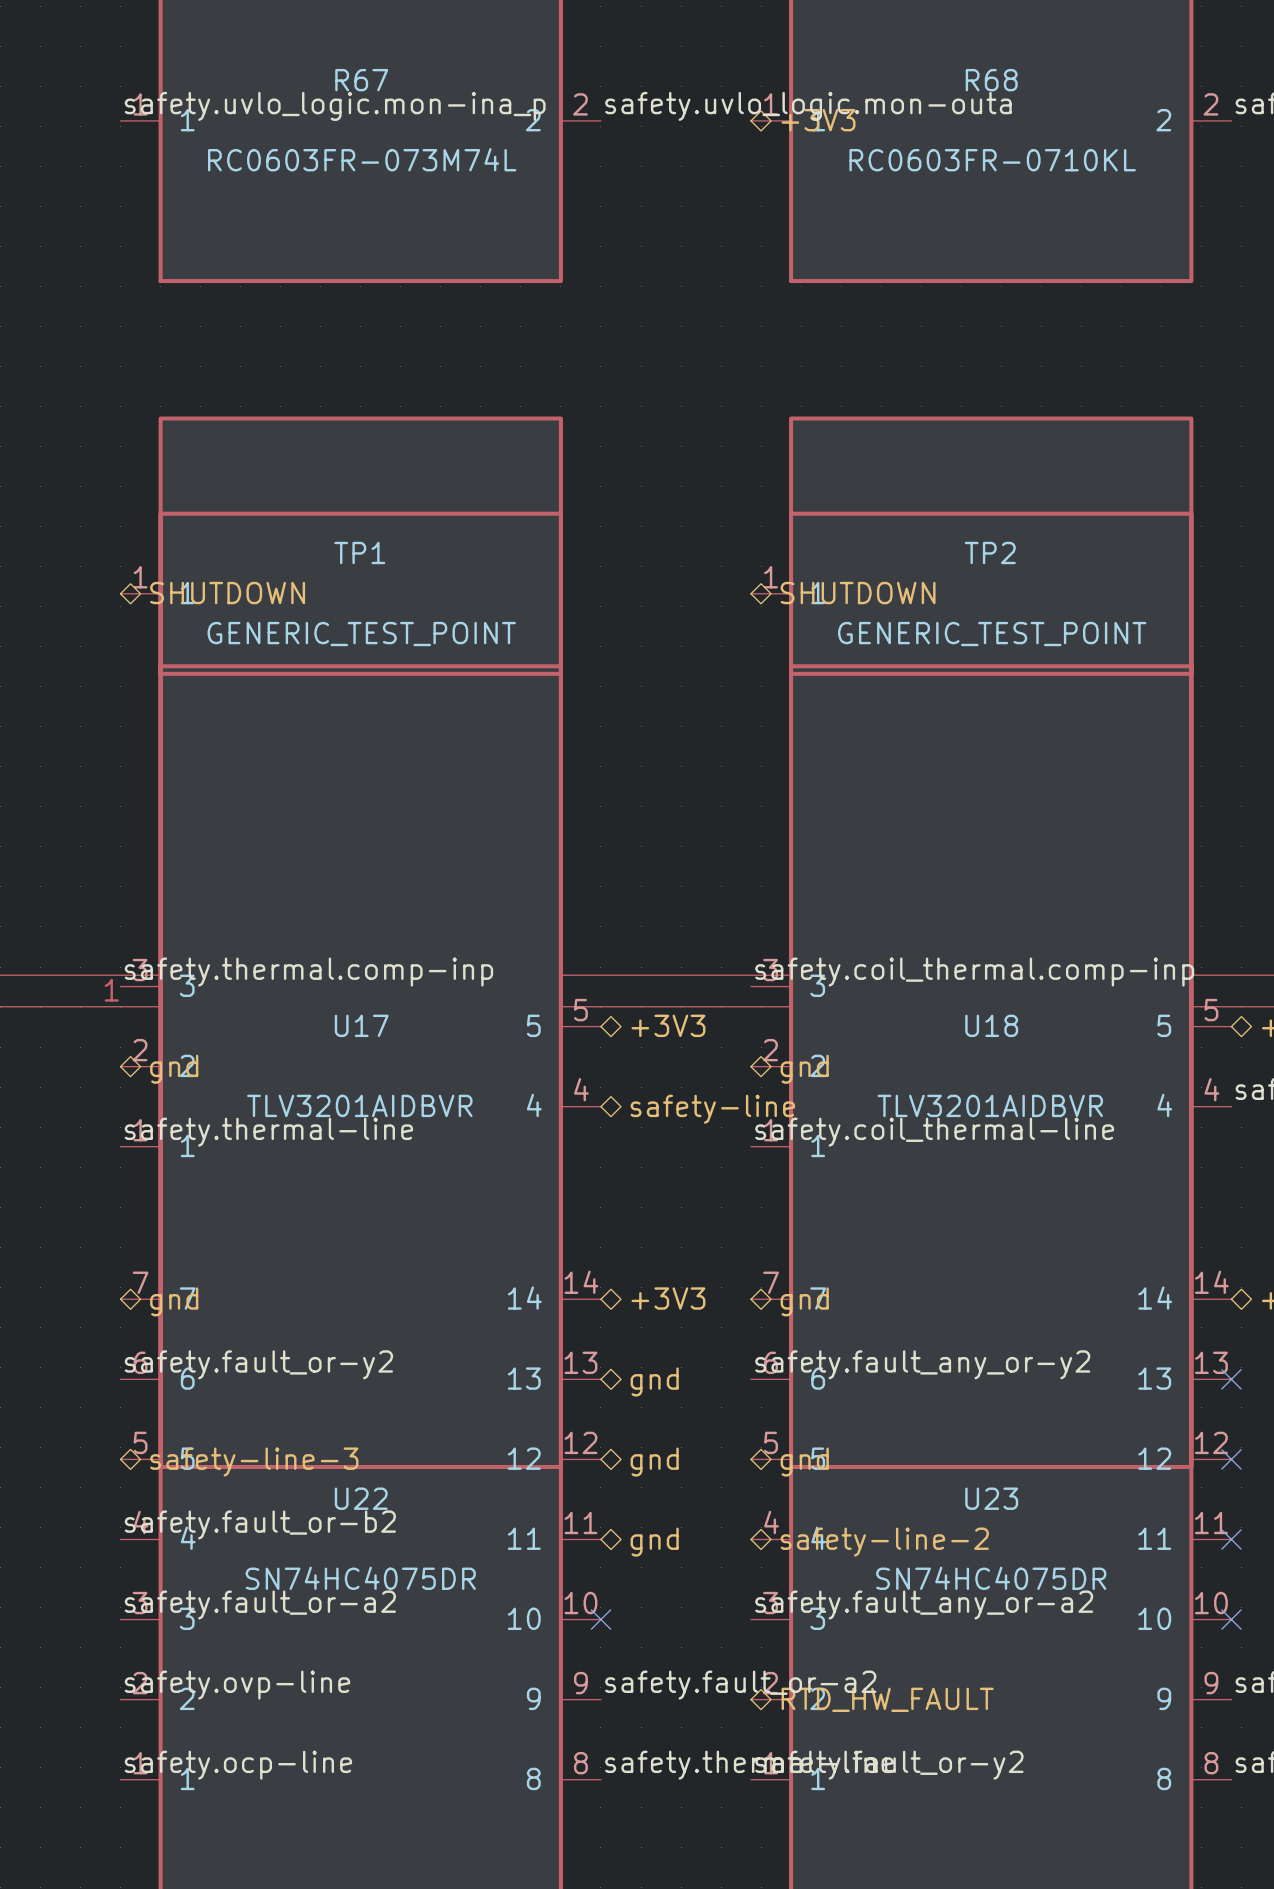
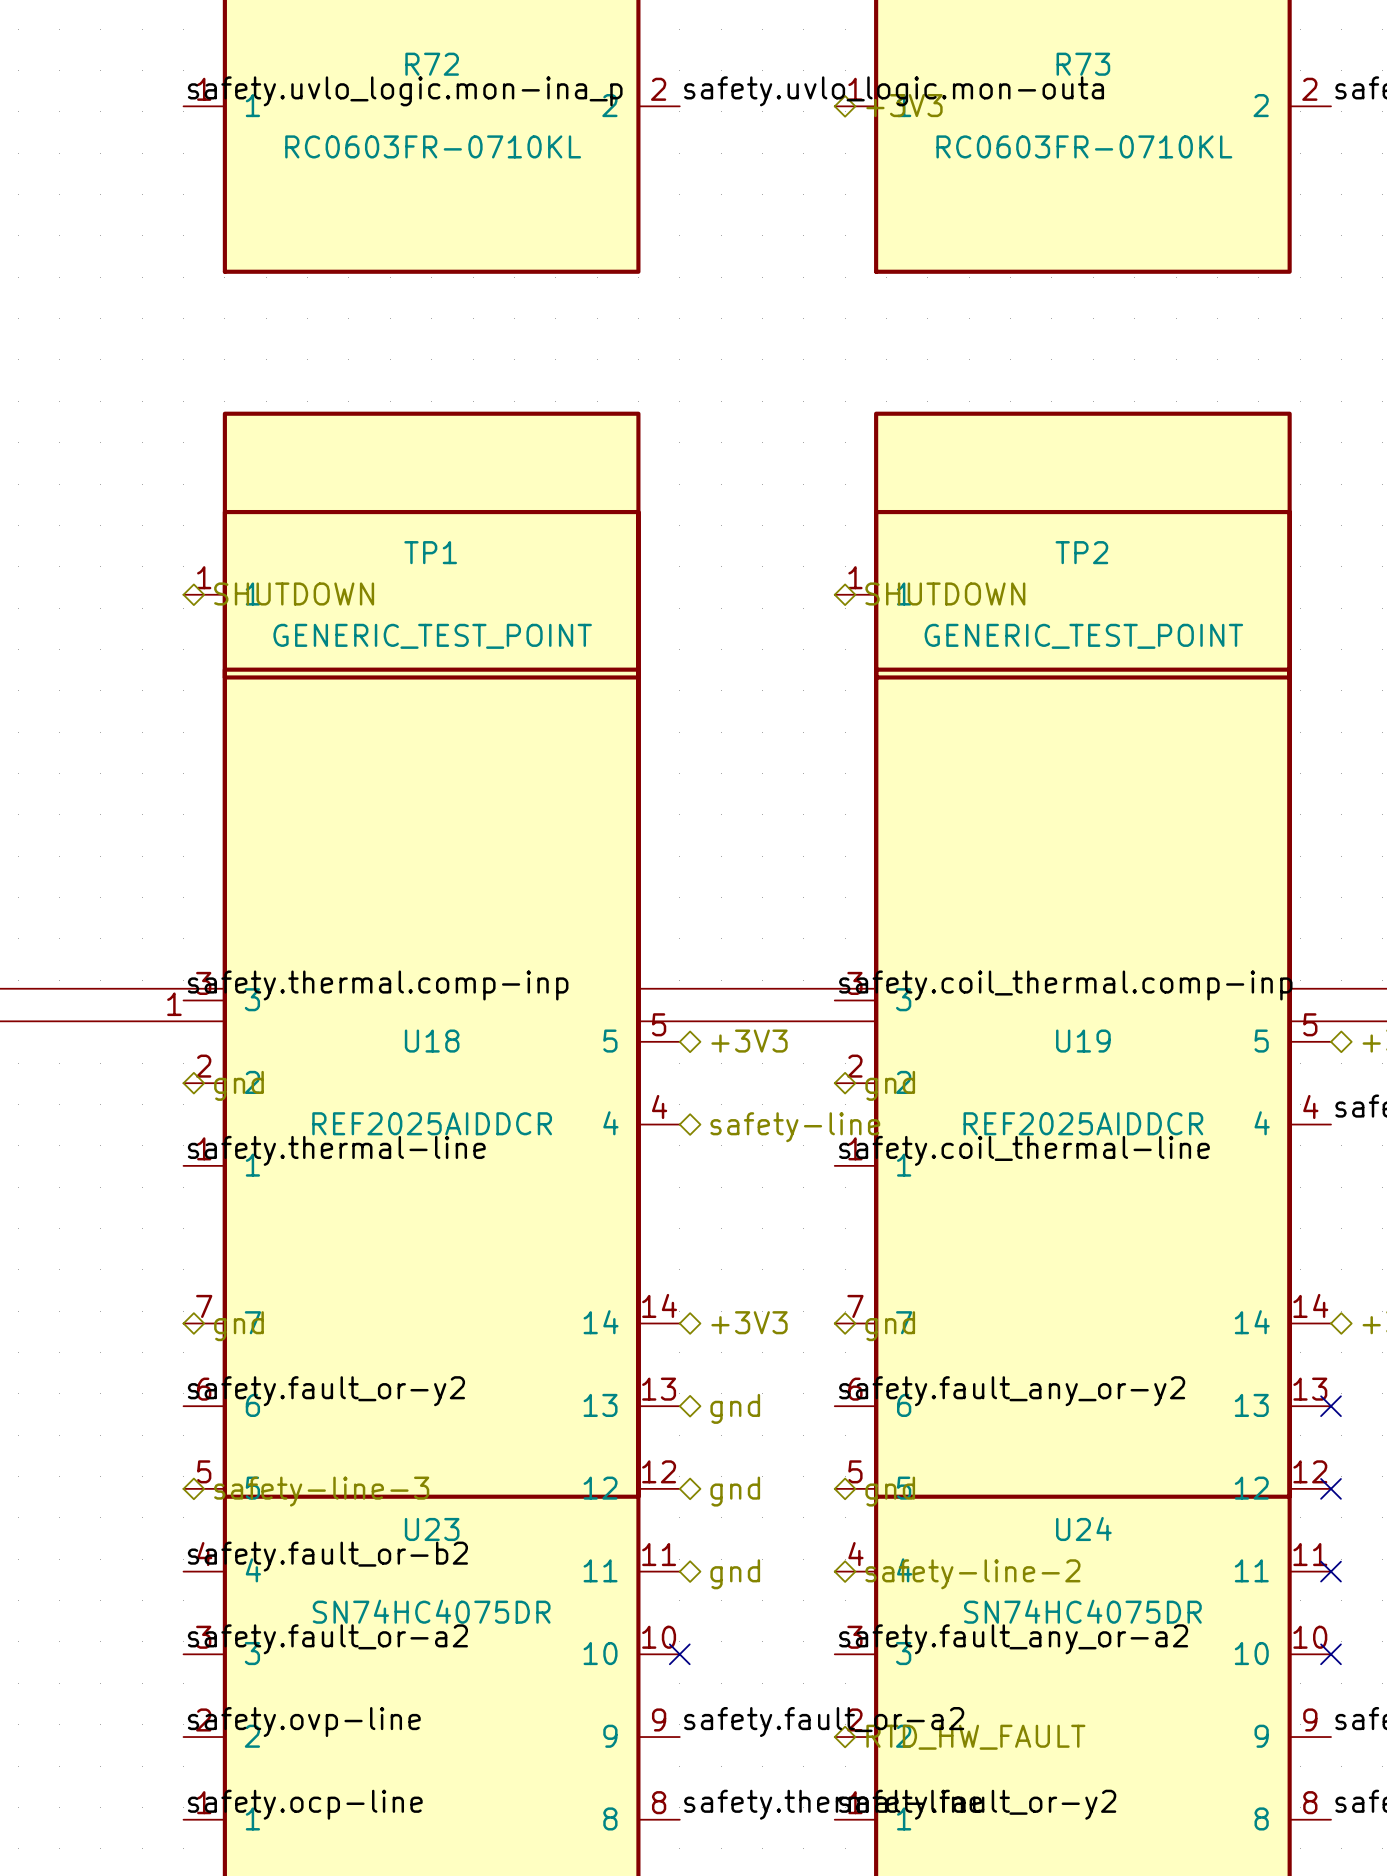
R67 name: R67 (361, 80) -> R72 (432, 64)
R68 name: R68 (991, 80) -> R73 (1083, 64)
R67 value: RC0603FR-073M74L (362, 159) -> RC0603FR-0710KL (433, 146)
U17 name: U17 (361, 1025) -> U18 (432, 1041)
U18 name: U18 (991, 1025) -> U19 (1083, 1041)
U17 value: TLV3201AIDBVR (359, 1105) -> REF2025AIDDCR (432, 1123)
U18 value: TLV3201AIDBVR (990, 1105) -> REF2025AIDDCR (1083, 1123)
U22 name: U22 (361, 1498) -> U23 (432, 1529)
U23 name: U23 (991, 1498) -> U24 (1083, 1528)

